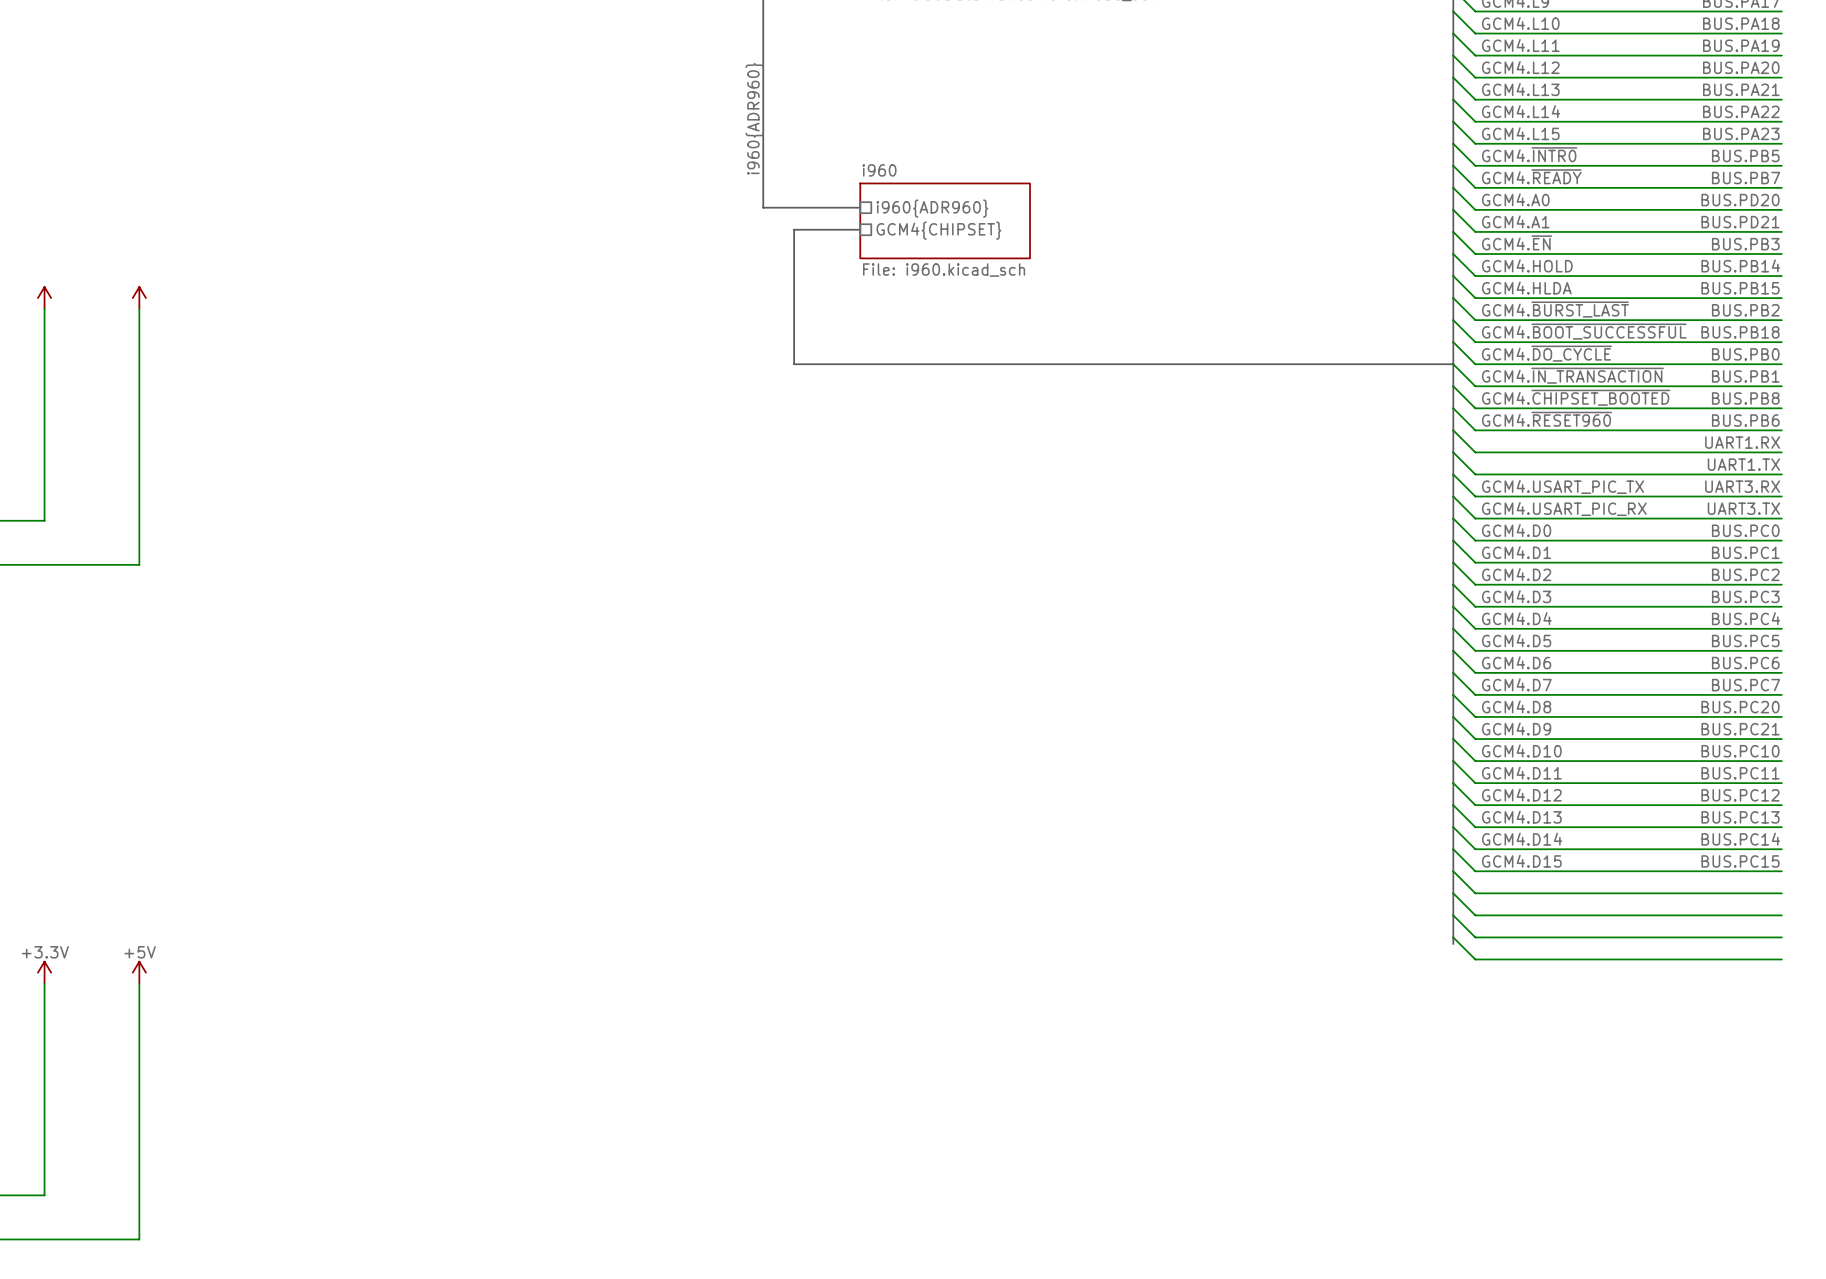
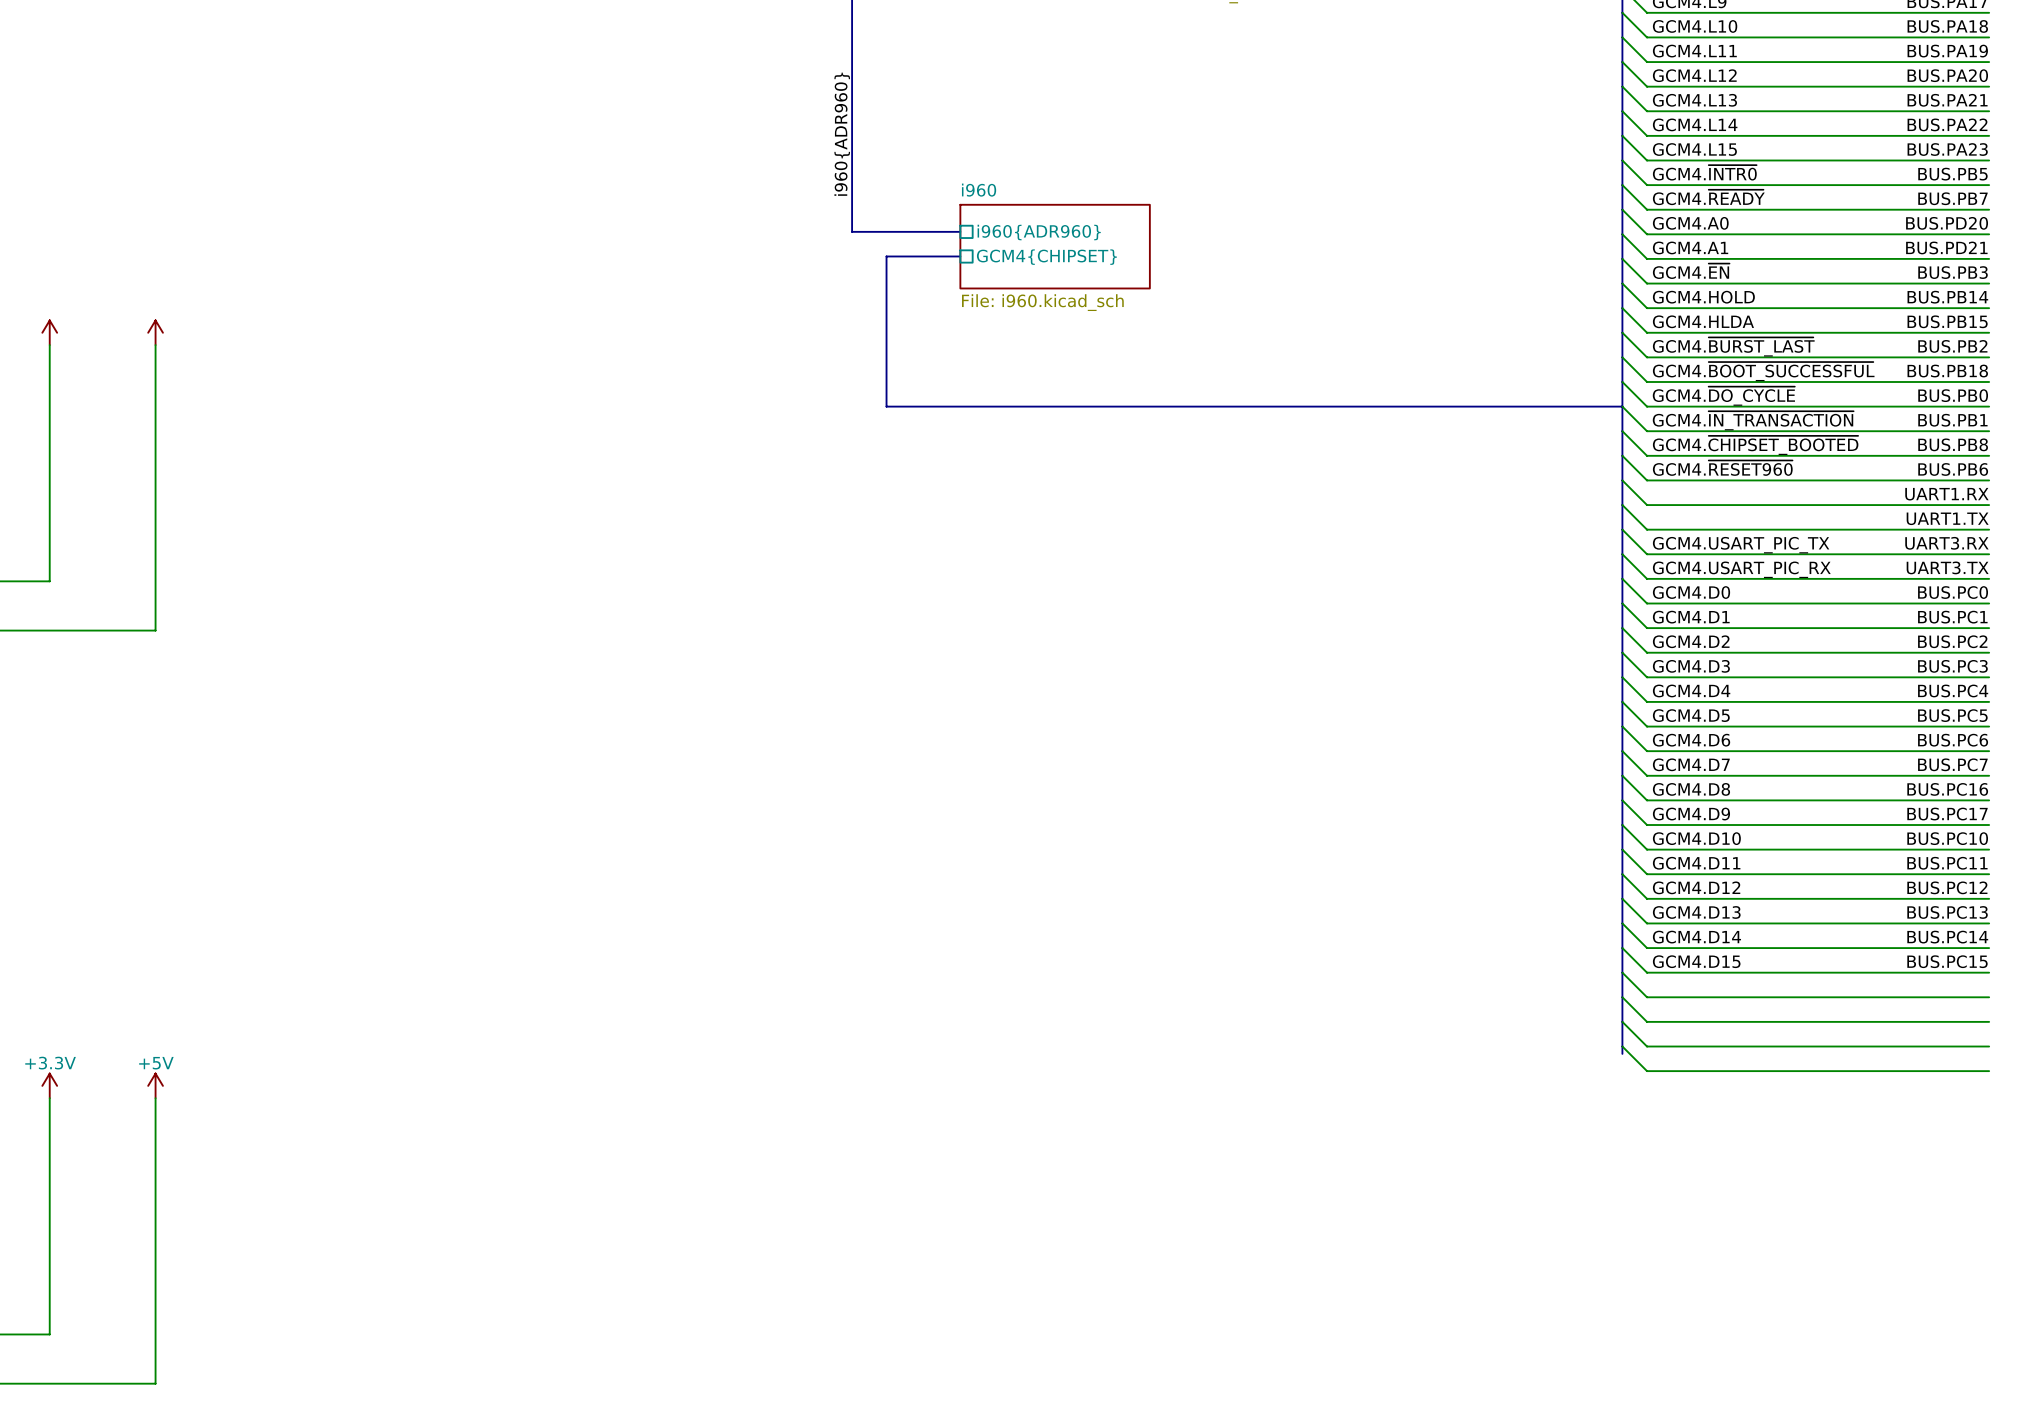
label: BUS.PC20 (1740, 707) -> BUS.PC16 (1947, 789)
label: BUS.PC21 (1740, 729) -> BUS.PC17 (1947, 814)

